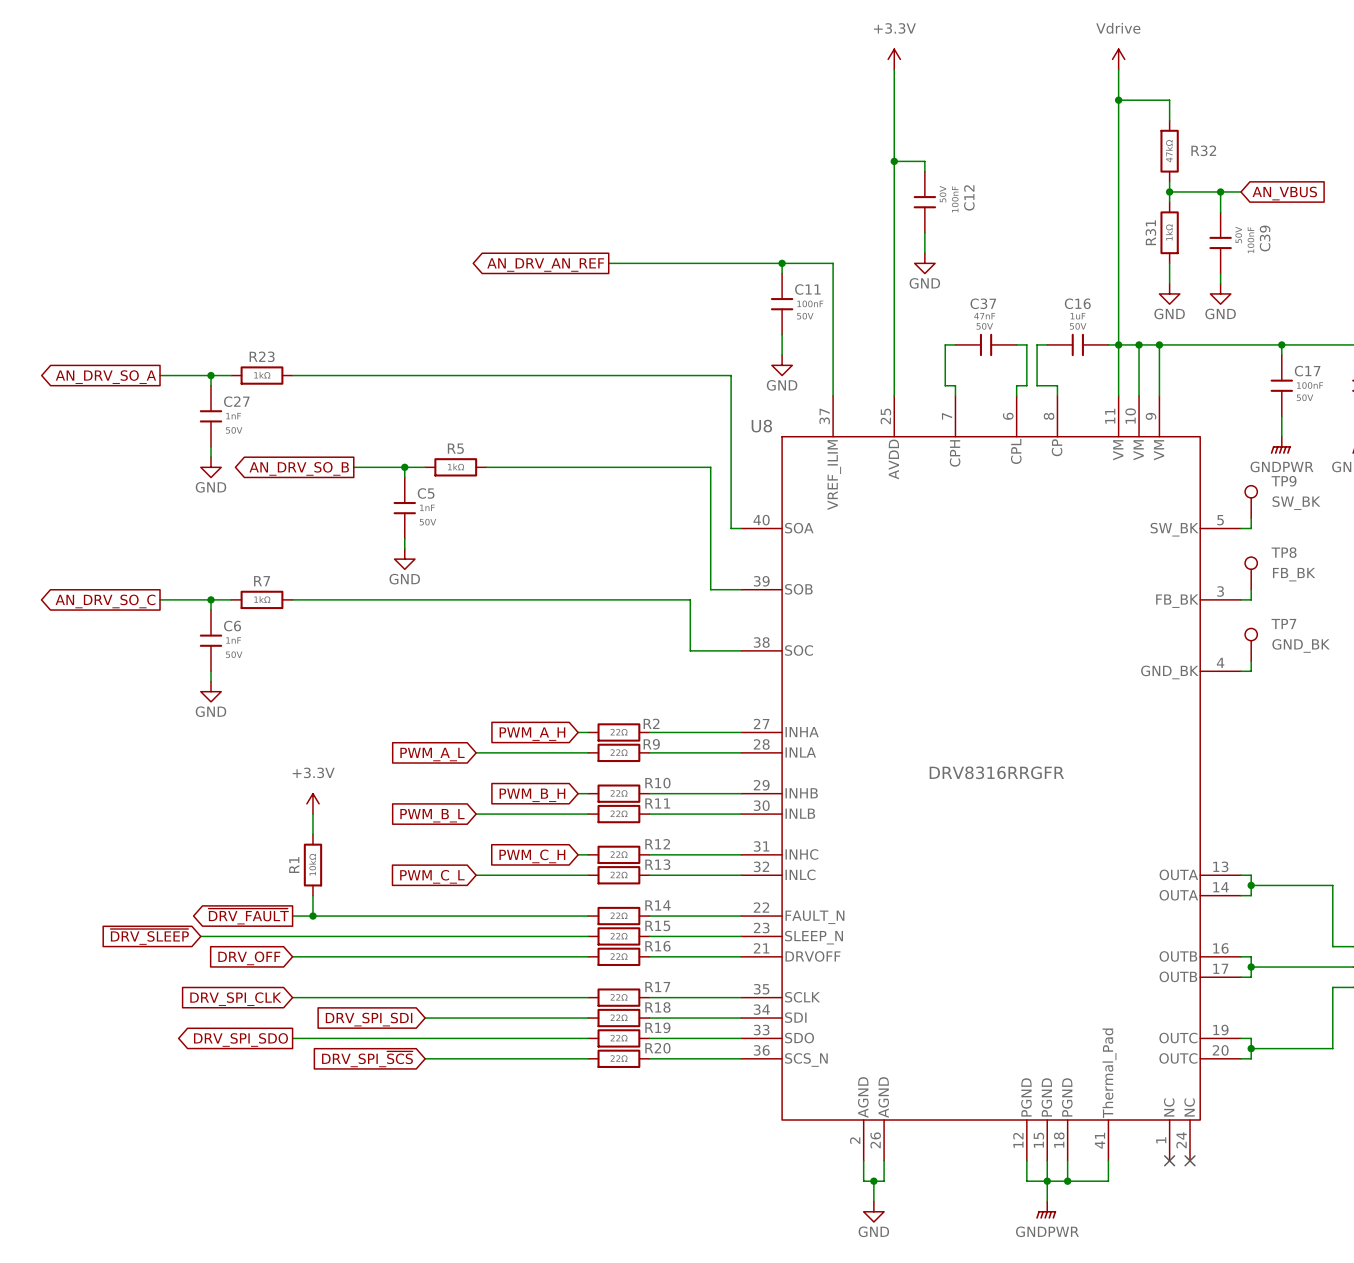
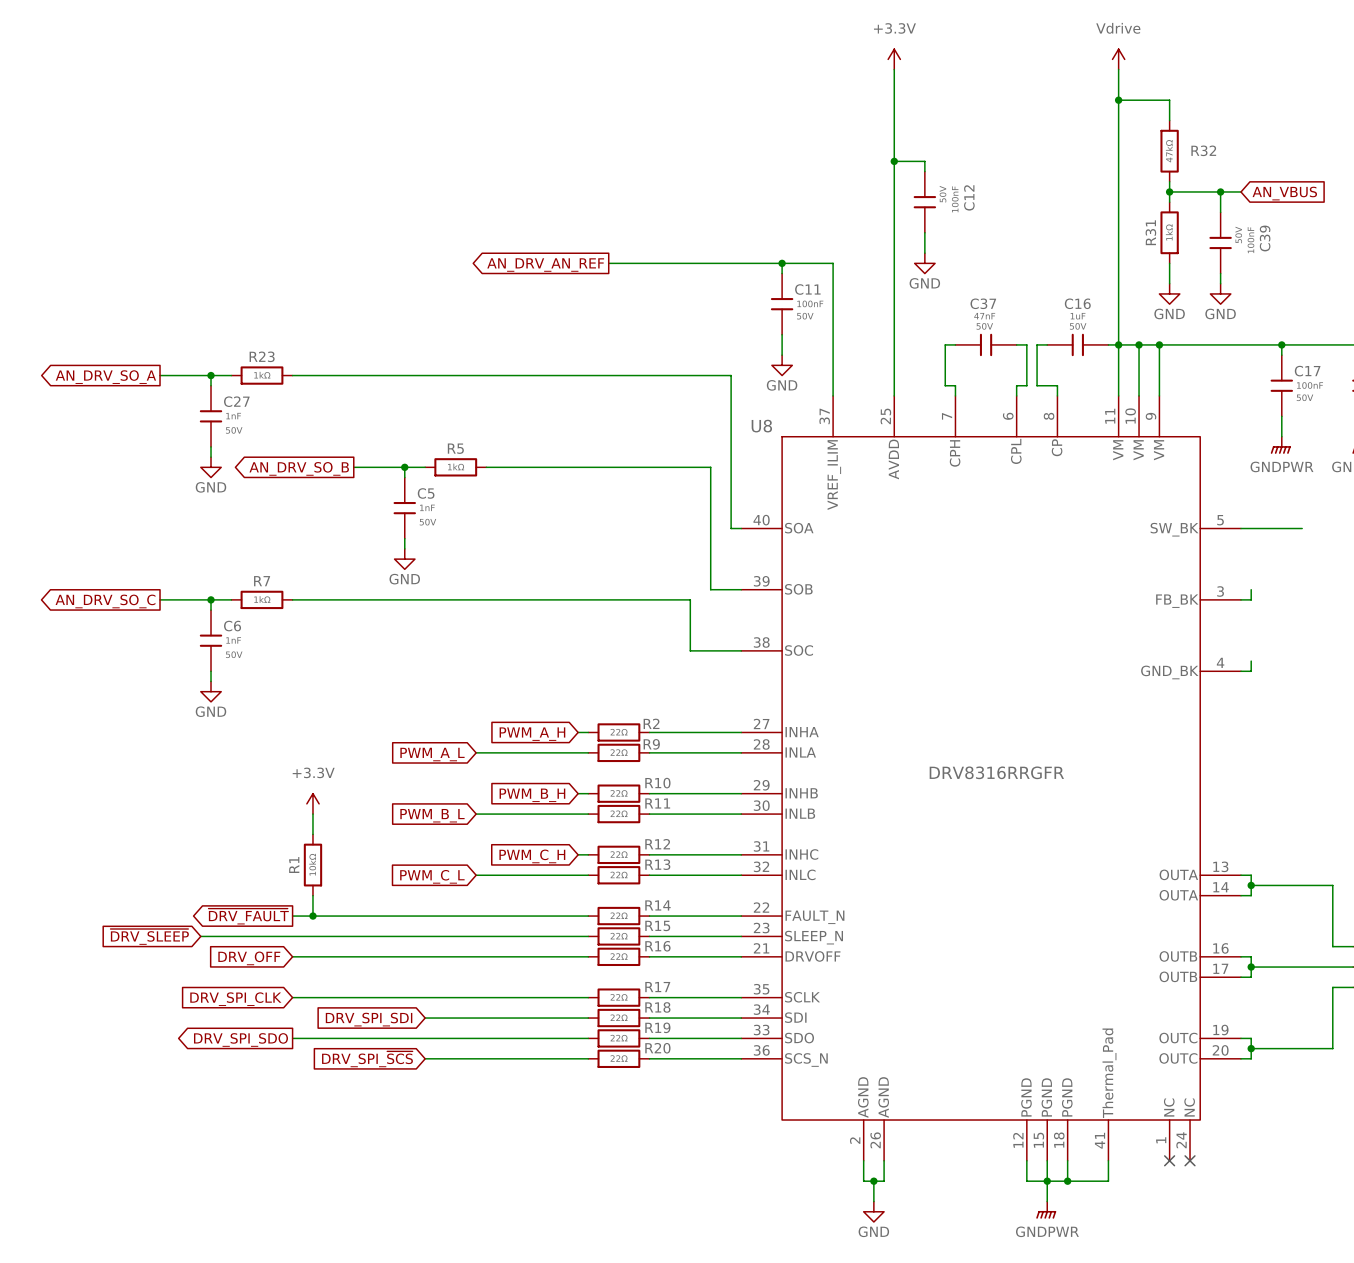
TP9: SW_BK (1251, 502) -> none
wire: (1251, 518) (1251, 528) -> (1302, 528) (1251, 528)
TP8: FB_BK (1251, 573) -> none
TP7: GND_BK (1251, 644) -> none

